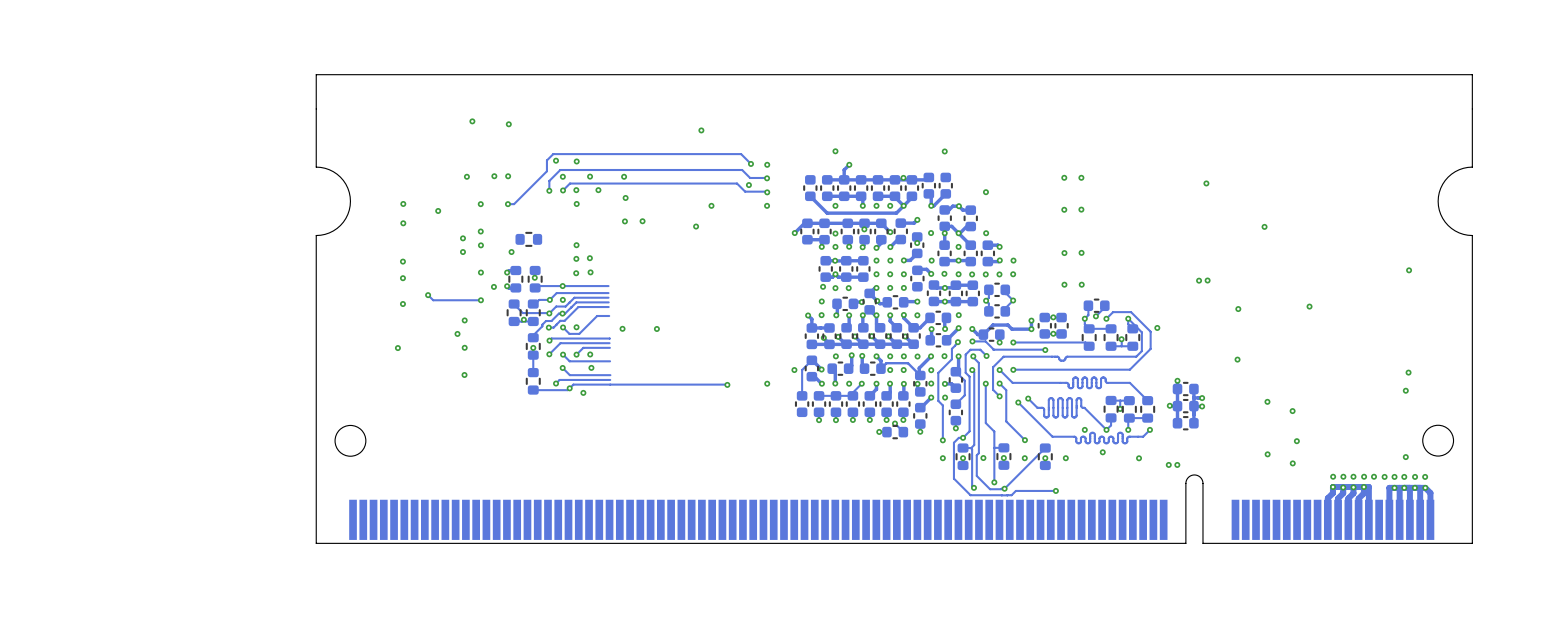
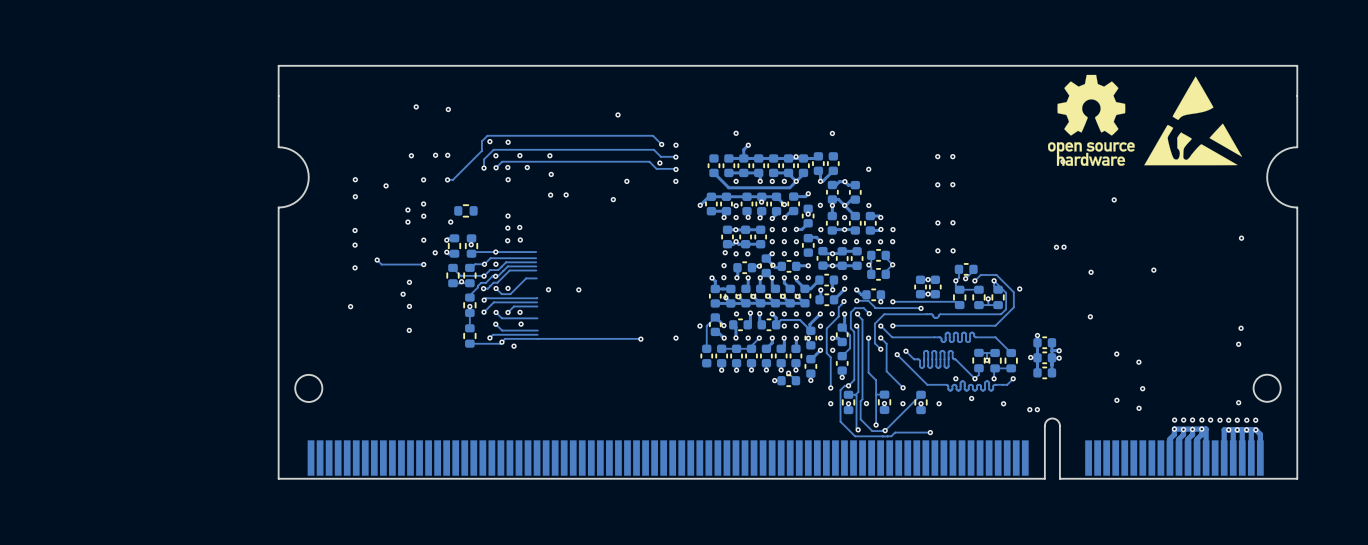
drawing: none -> [1048, 74, 1243, 166]
track: (1031, 320) (1031, 329) (1011, 329) (1007, 325) (992, 325) (983, 334) -> none
via: (1031, 320) -> none
via: (1031, 329) -> none

